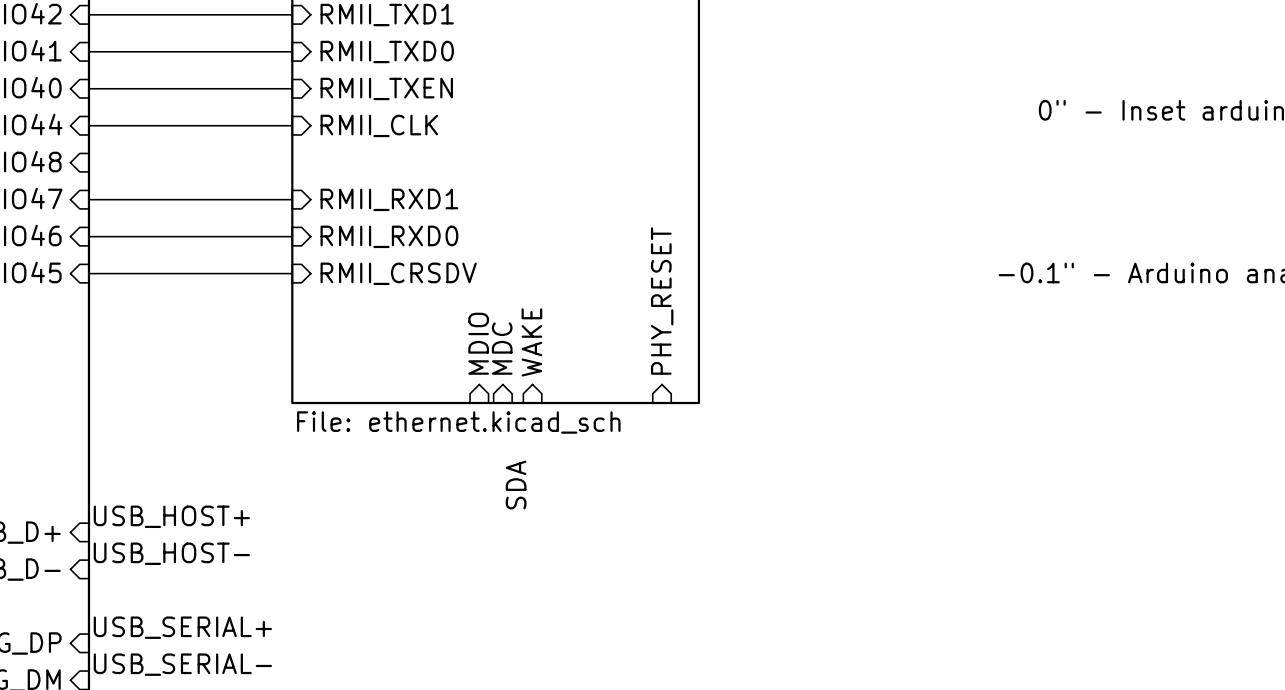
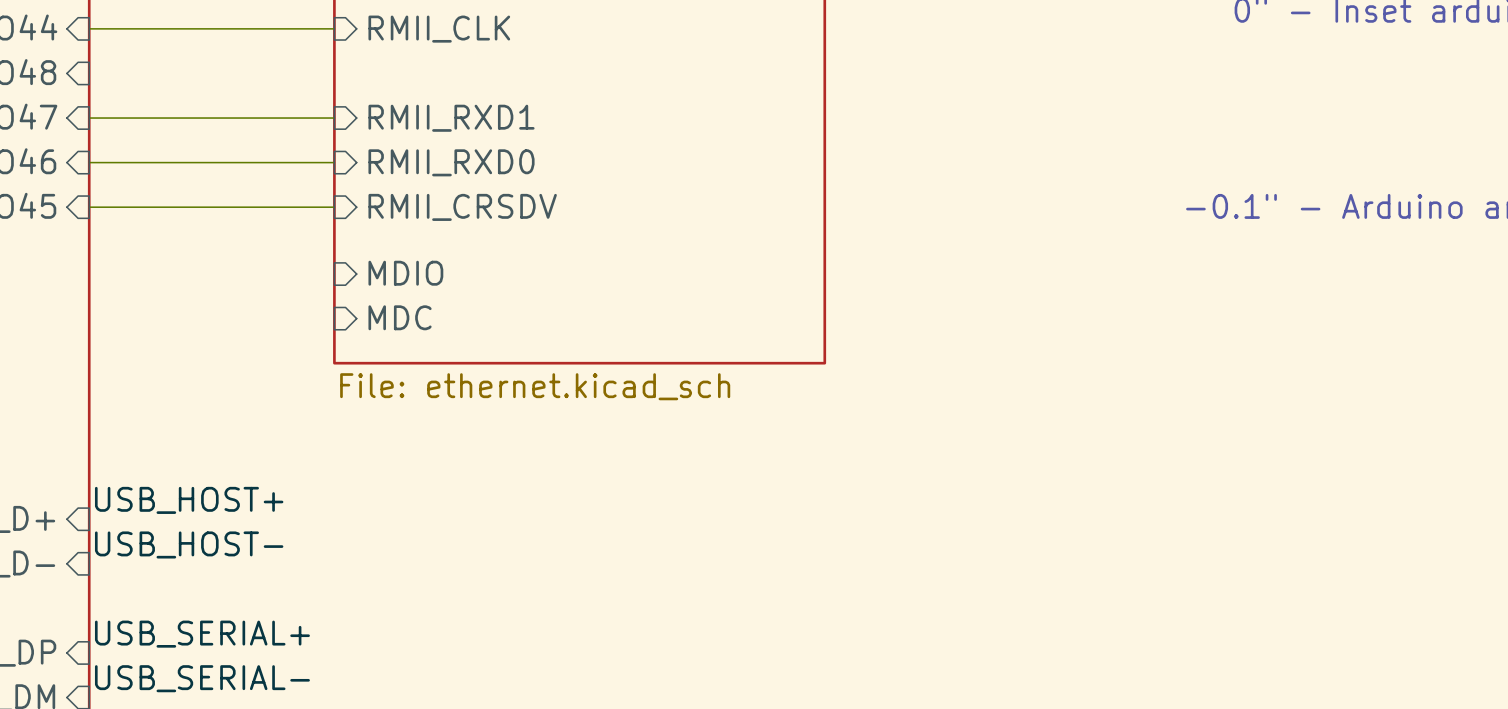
sheet pin: PHY_RESET (662, 301) -> none
sheet pin: WAKE (531, 342) -> none
sheet pin rotation: 0° (478, 343) -> 90° clockwise (405, 273)
sheet pin position: MDIO (478, 343) -> MDIO (405, 273)
sheet pin rotation: 0° (502, 348) -> 90° clockwise (400, 317)
sheet pin position: MDC (502, 348) -> MDC (400, 317)
label: SDA (516, 485) -> none

